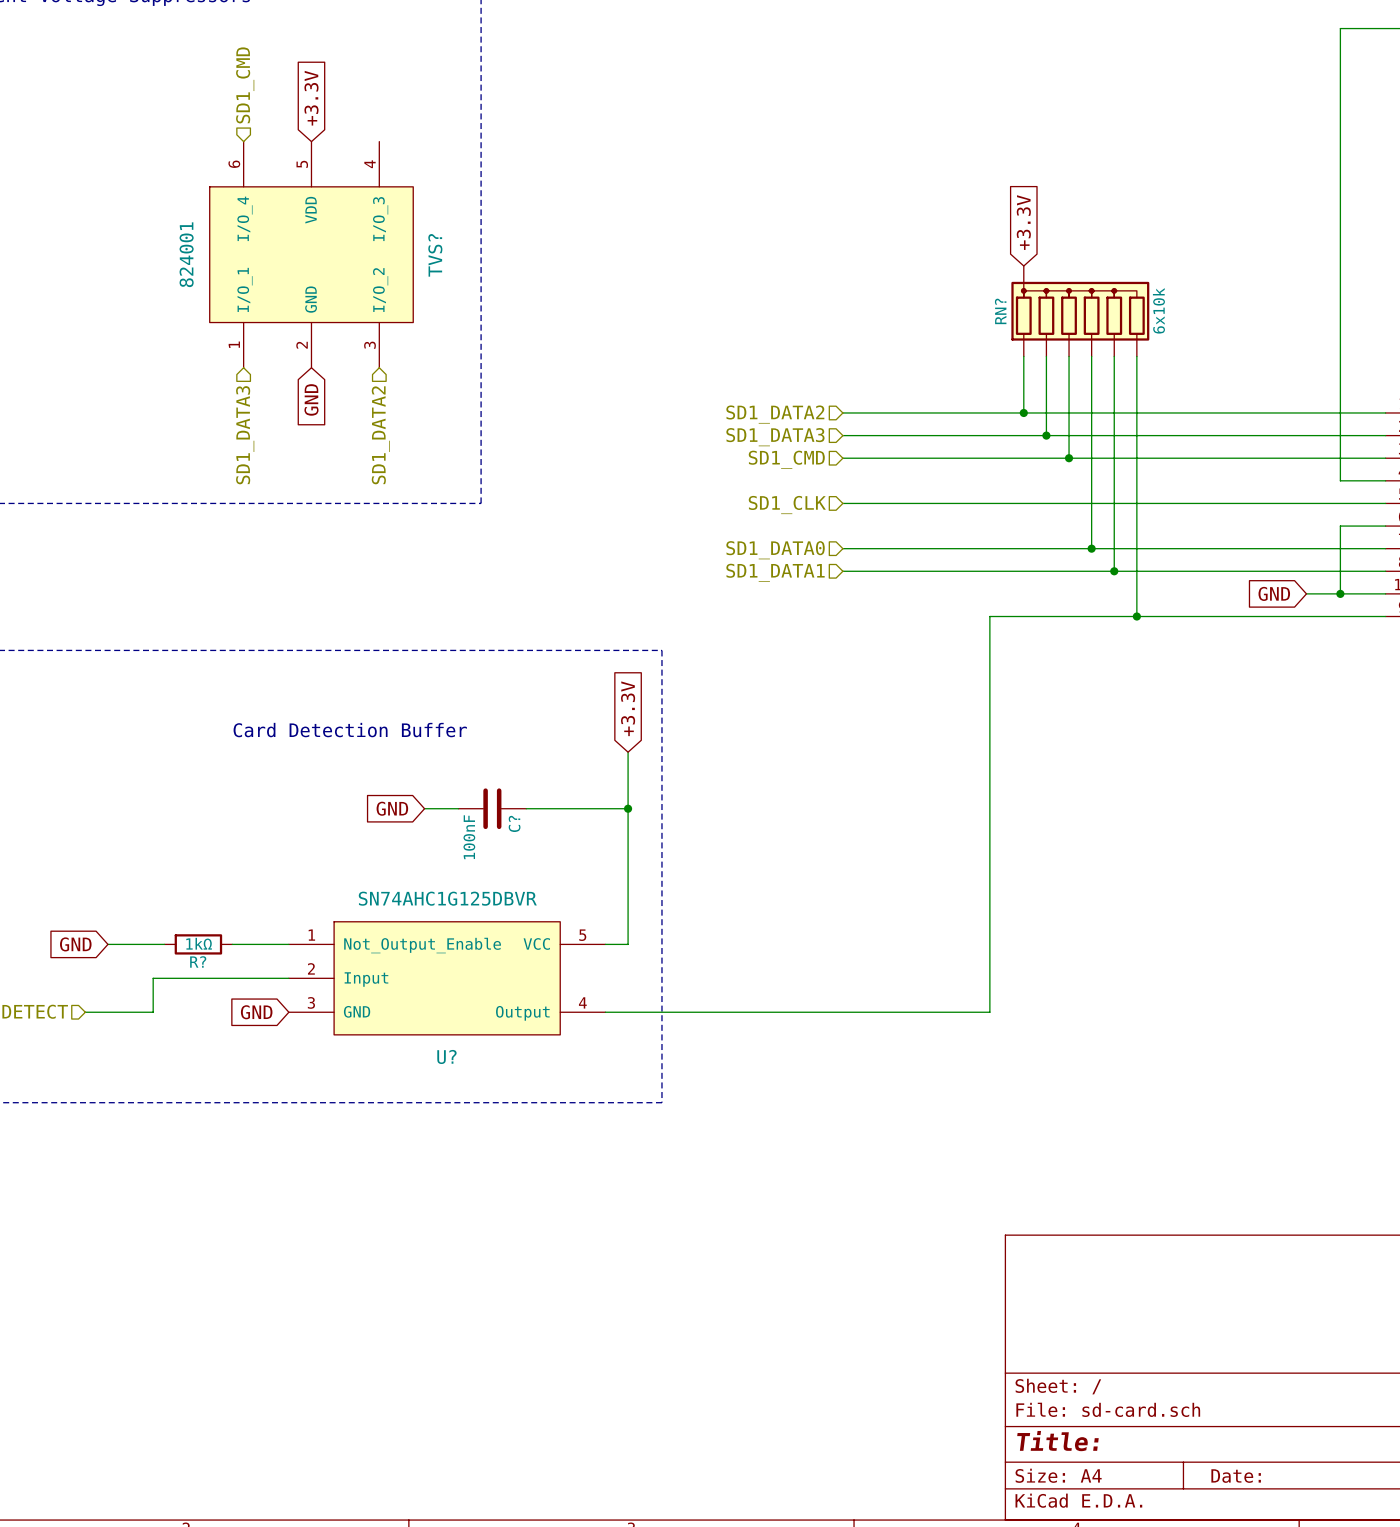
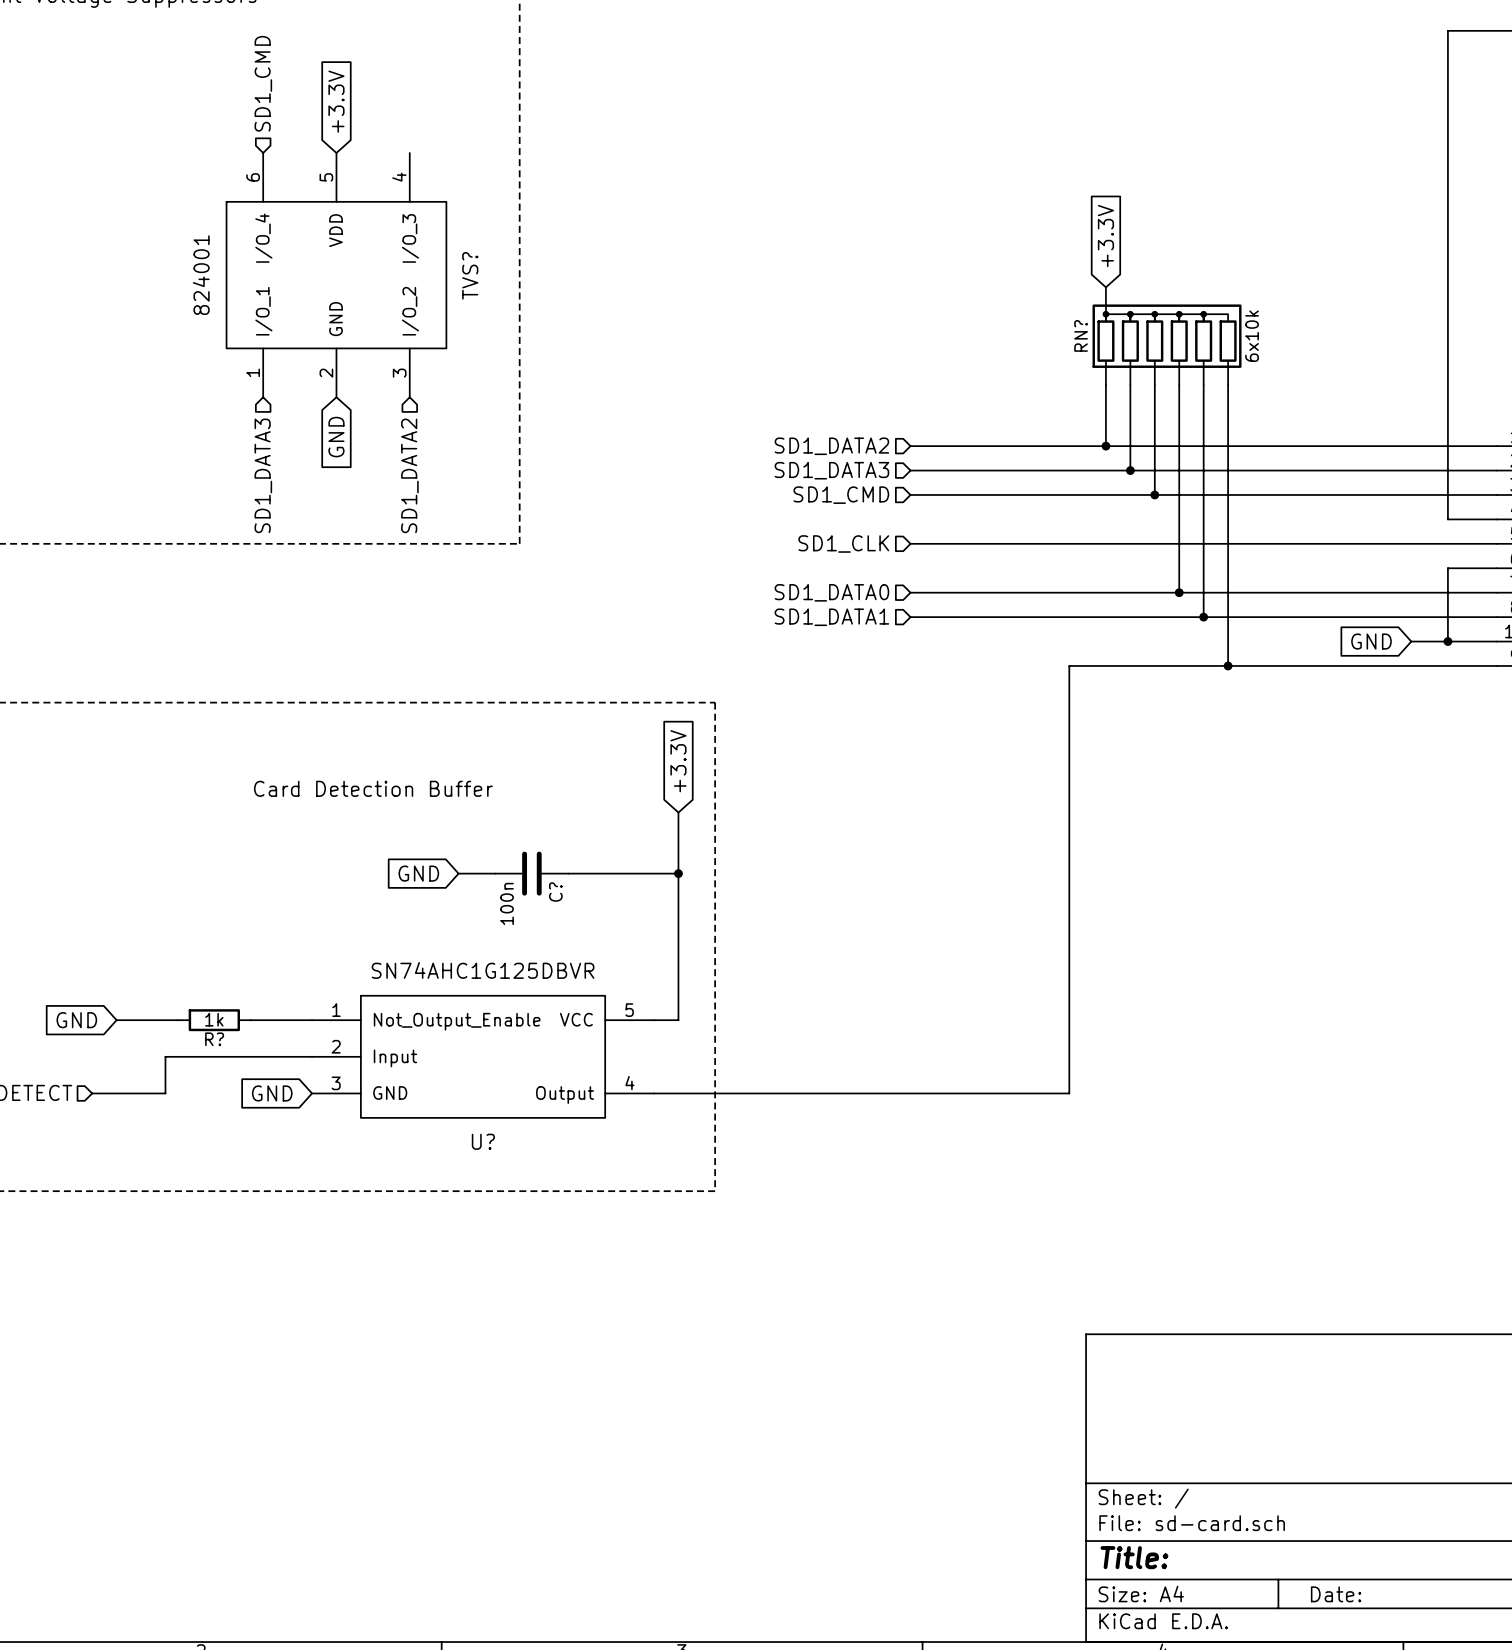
C? value: 100nF (469, 837) -> 100n (507, 903)
R? value: 1kΩ (199, 943) -> 1k (214, 1019)

